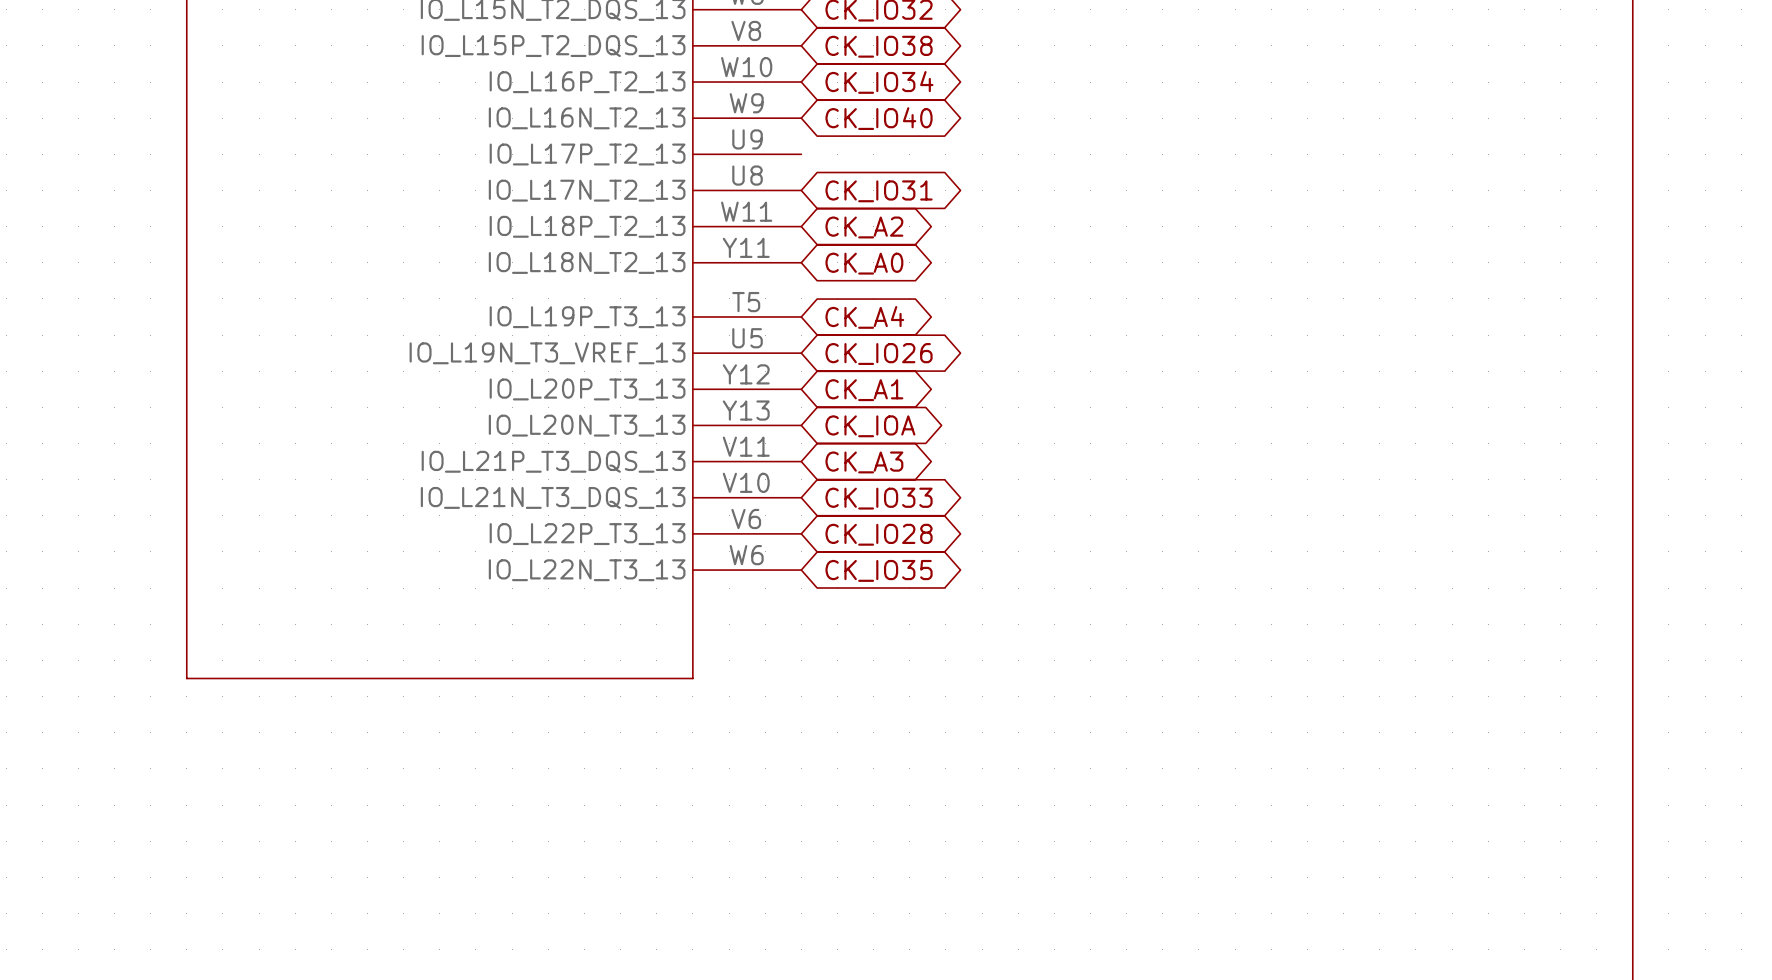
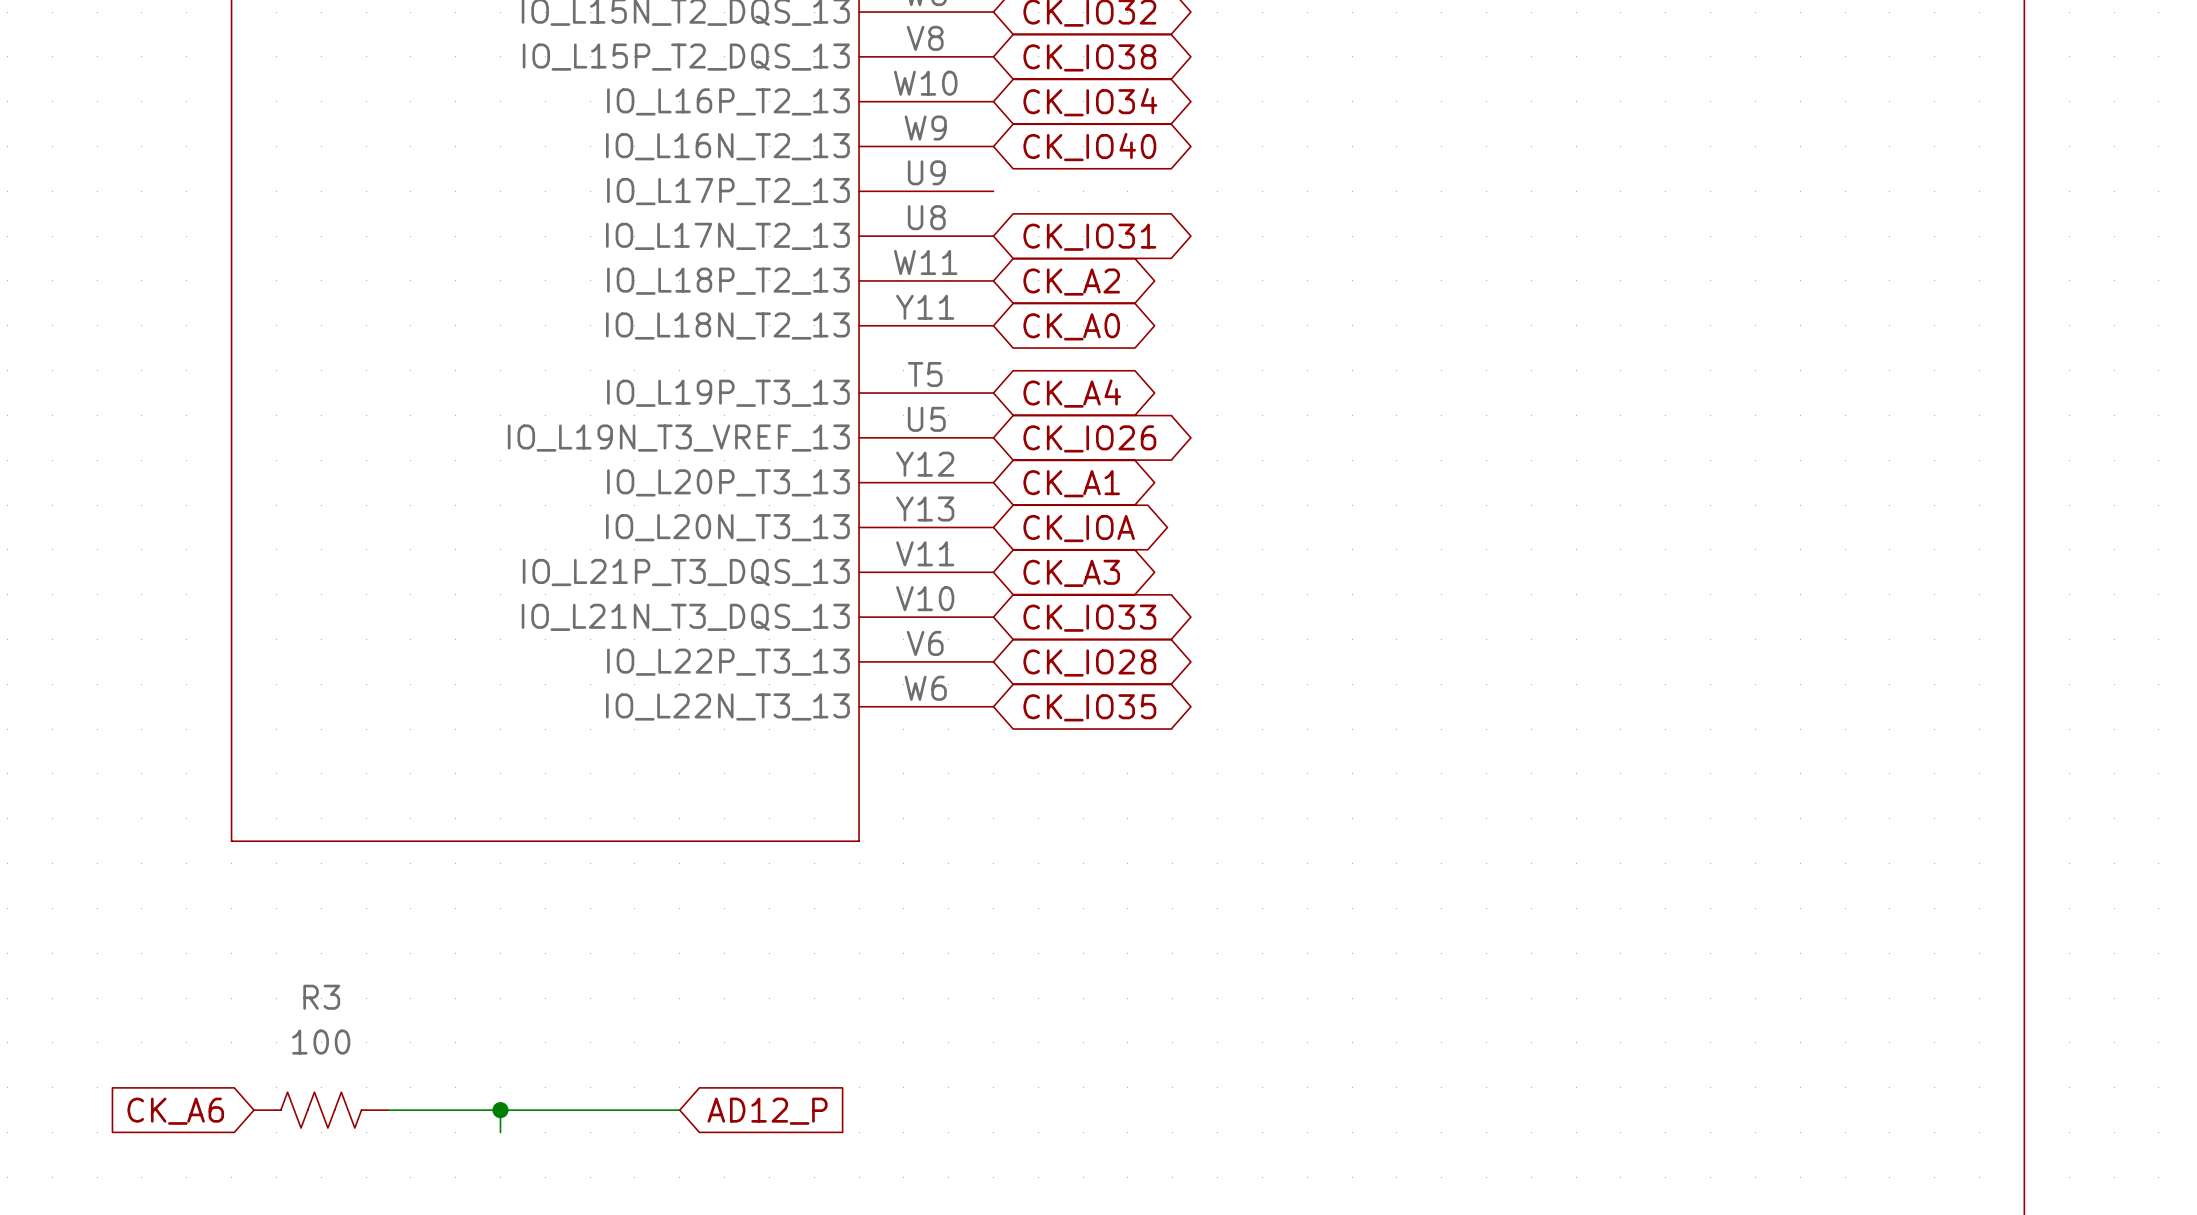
R3: none -> 100 (321, 1110)
wire: none -> (388, 1110) (679, 1110)
wire: none -> (500, 1110) (500, 1132)
junction: none -> (500, 1110)
global label: none -> CK_A6 (175, 1111)
global label: none -> AD12_P (767, 1111)

